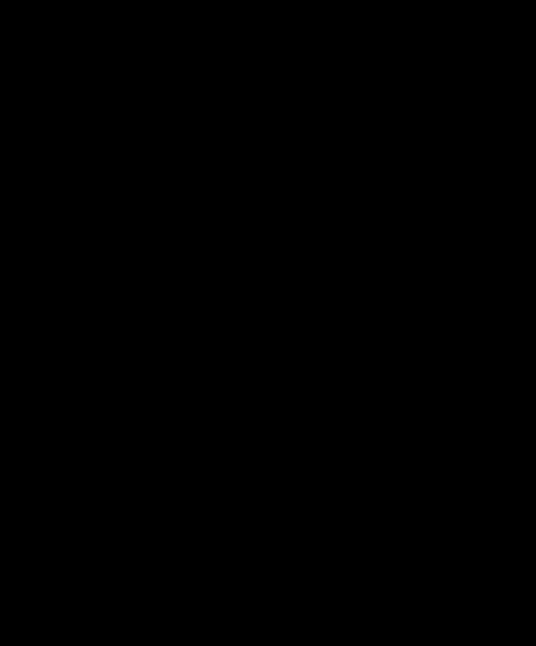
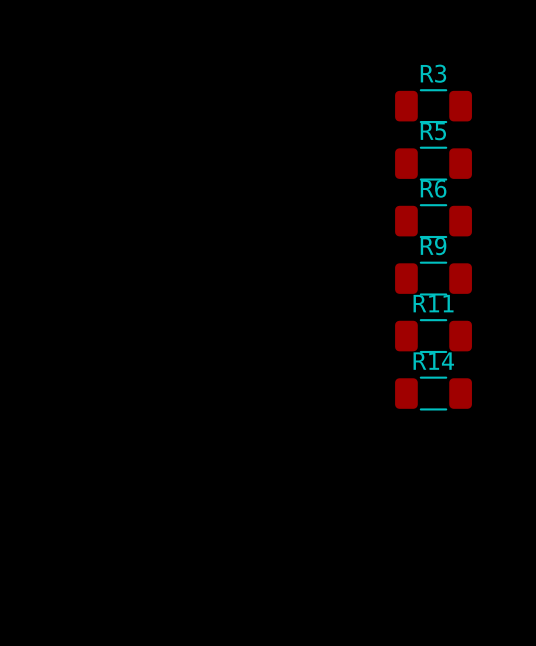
R3: none -> (433, 106)
R5: none -> (433, 163)
R6: none -> (433, 221)
R9: none -> (433, 278)
R11: none -> (433, 336)
R14: none -> (433, 393)

